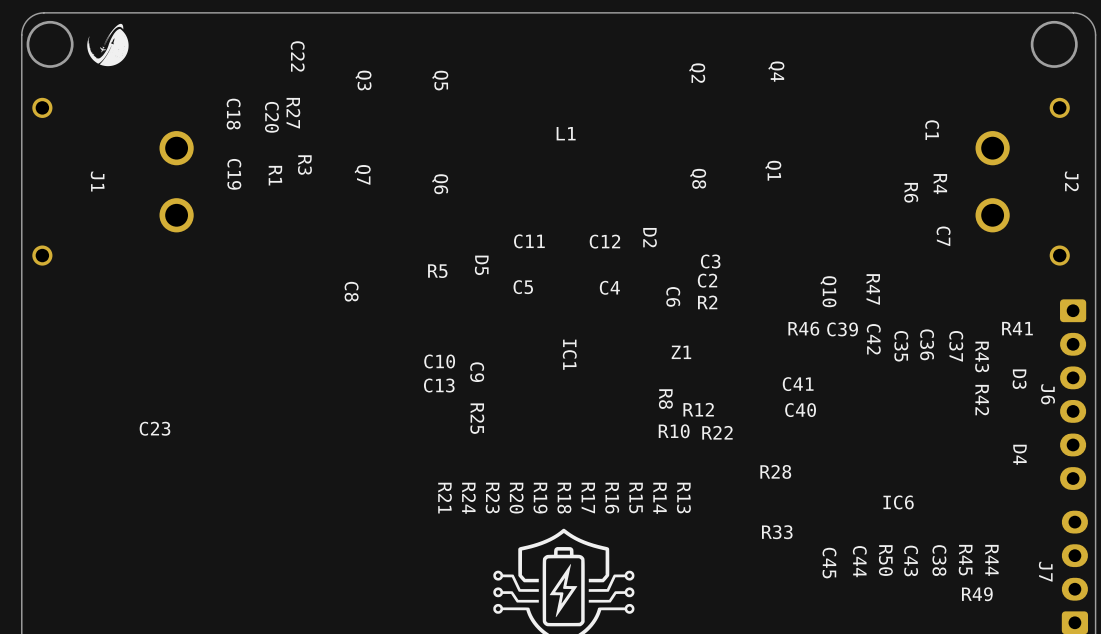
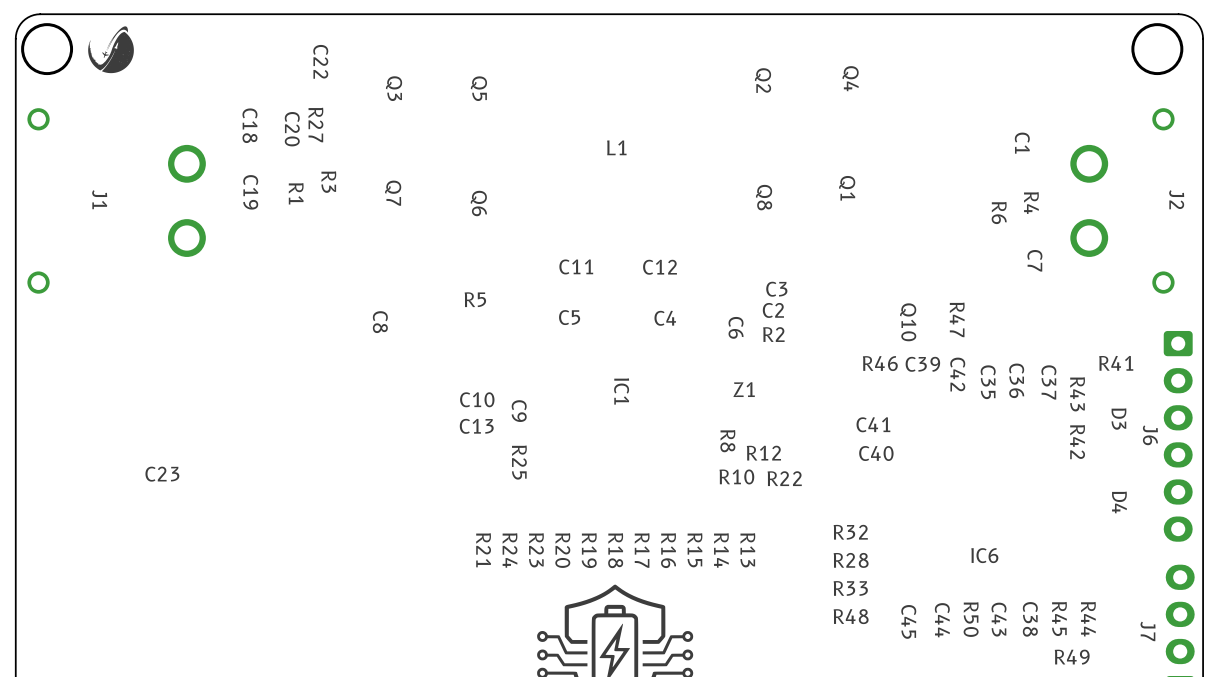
D2: (650, 237) -> none
D5: (481, 265) -> none
R28 position: (775, 471) -> (851, 560)
R32: none -> (850, 532)
R48: none -> (851, 616)

